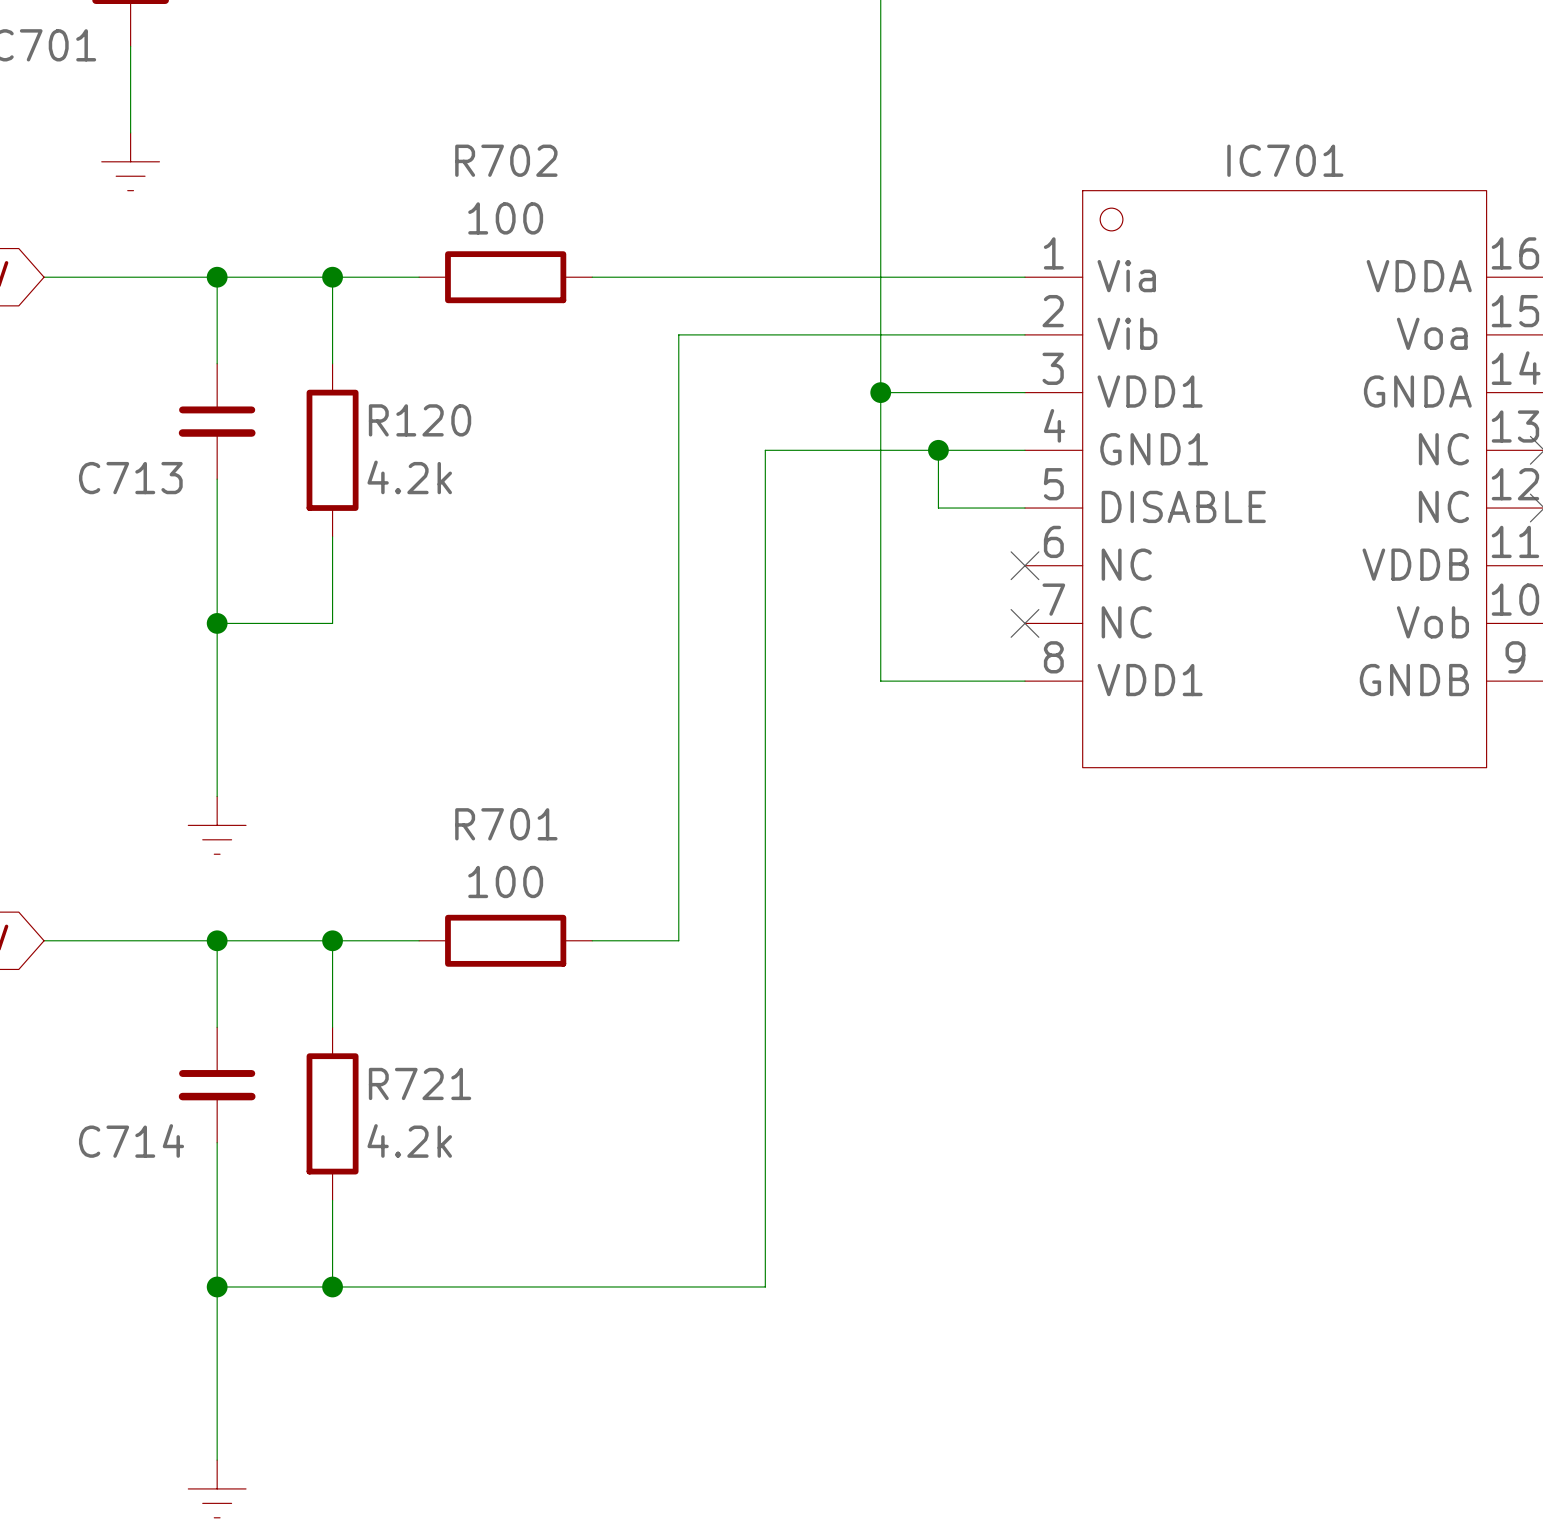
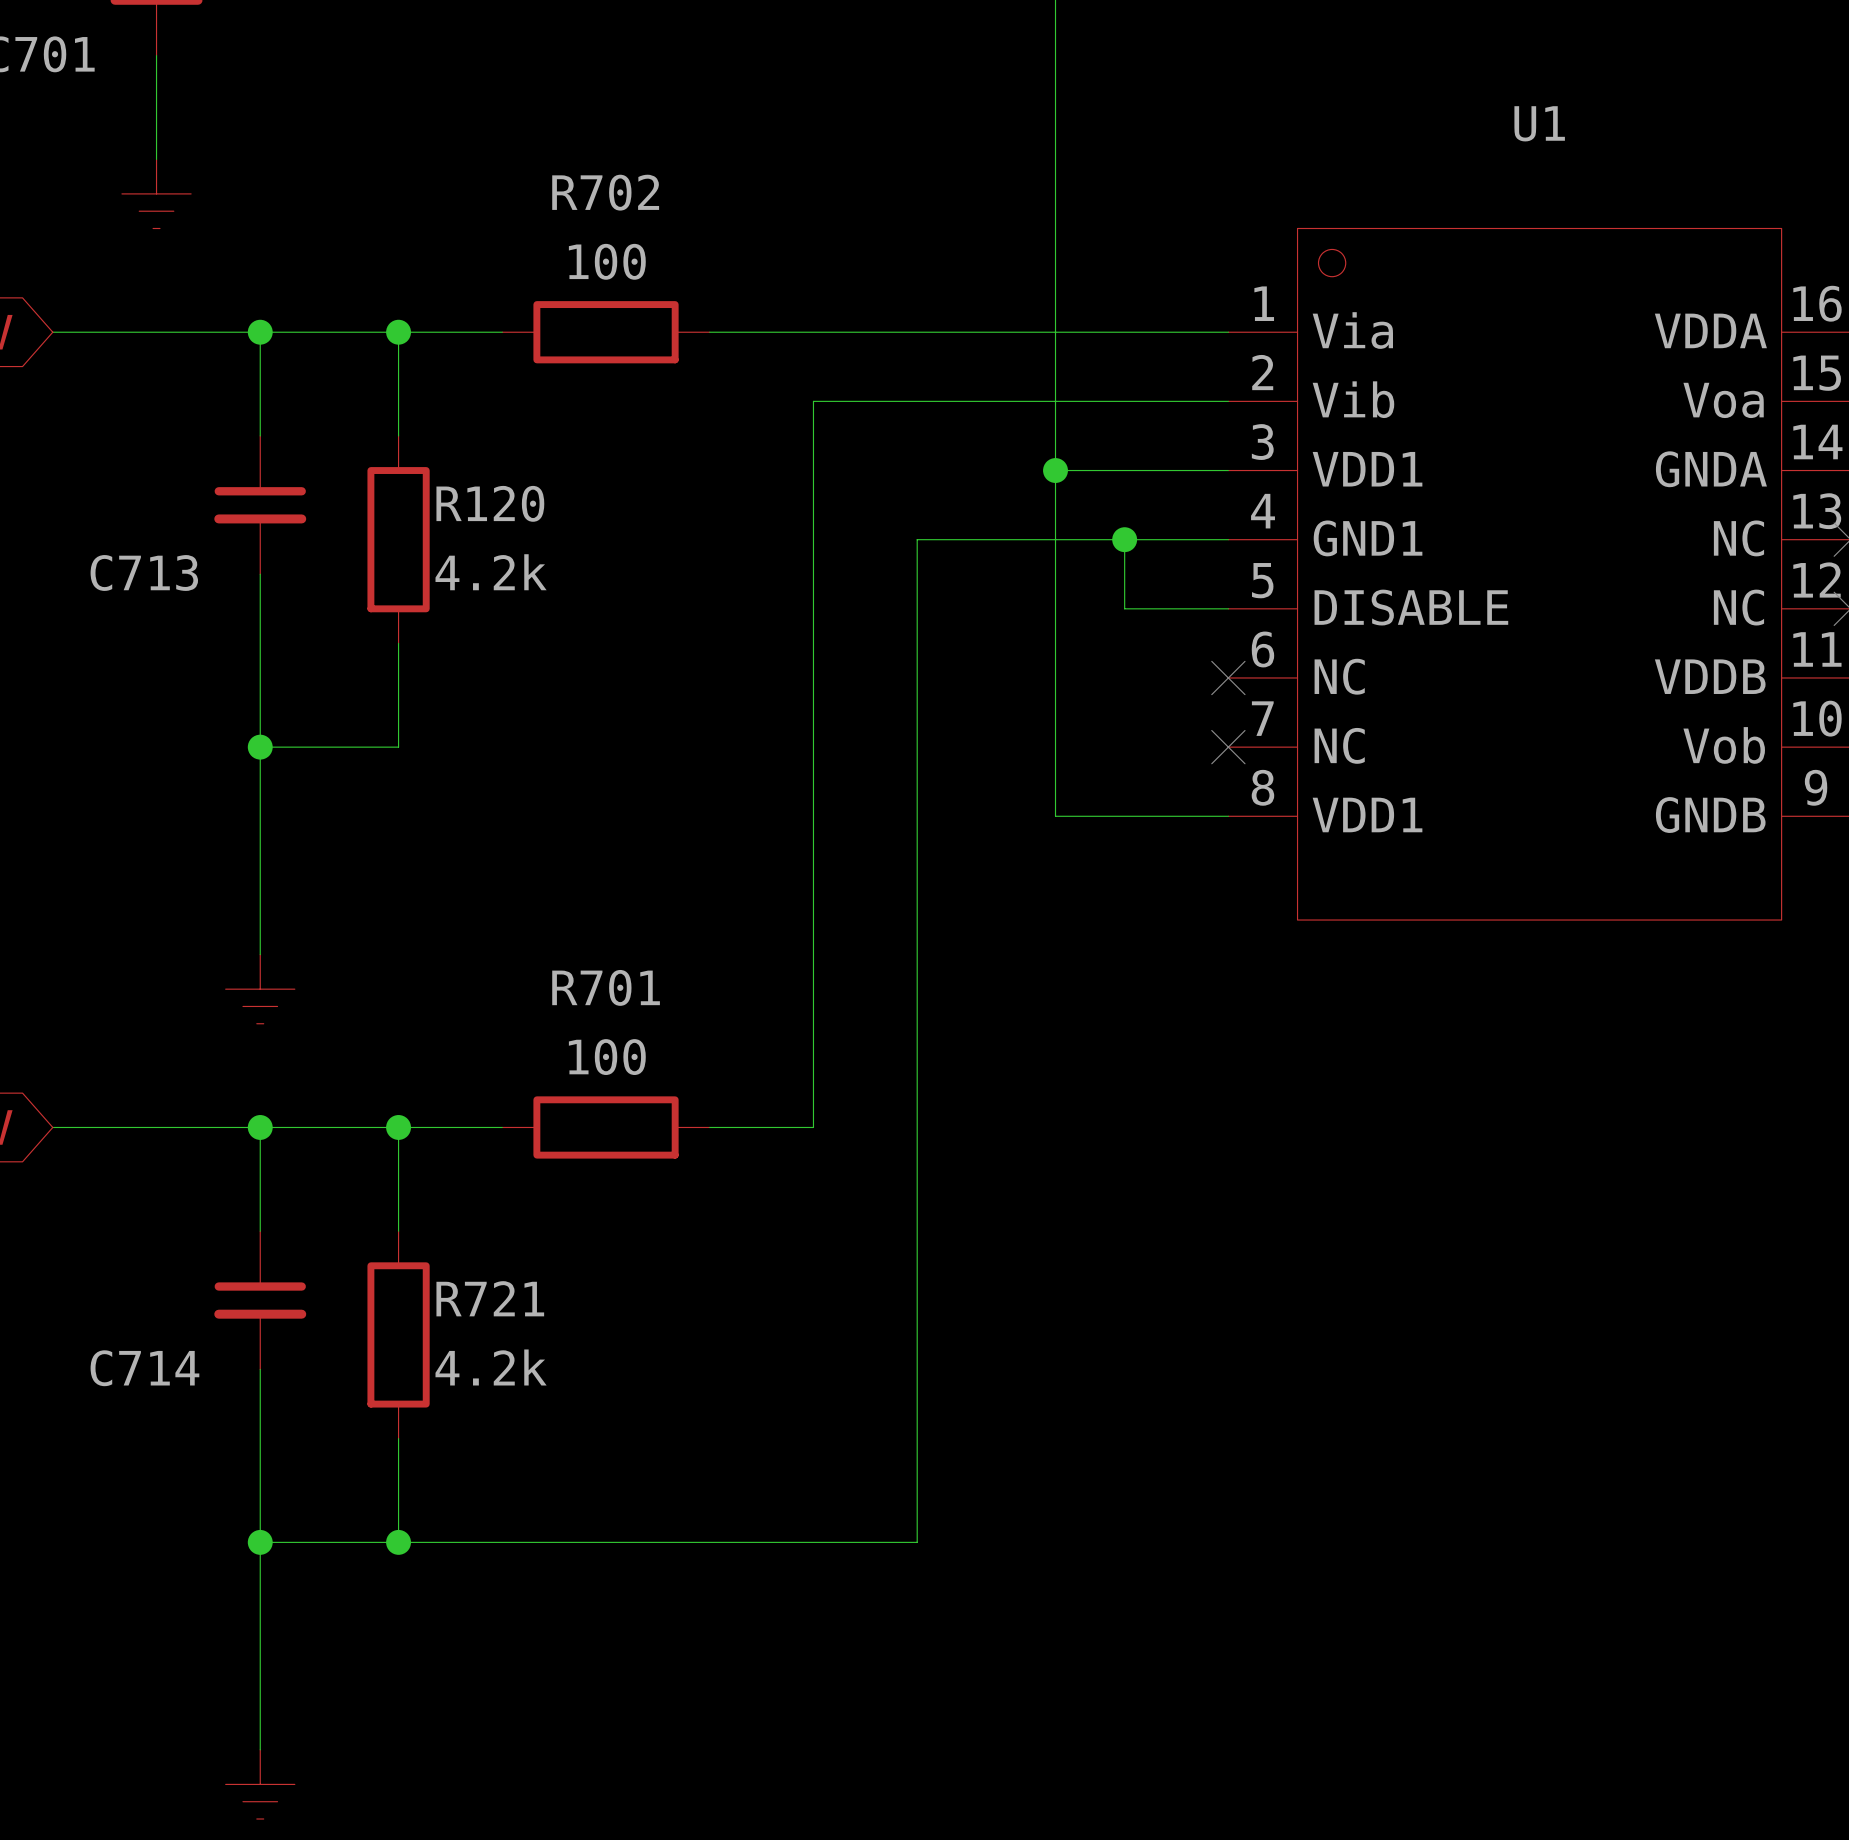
IC701 name: IC701 (1285, 160) -> U1 (1539, 123)

